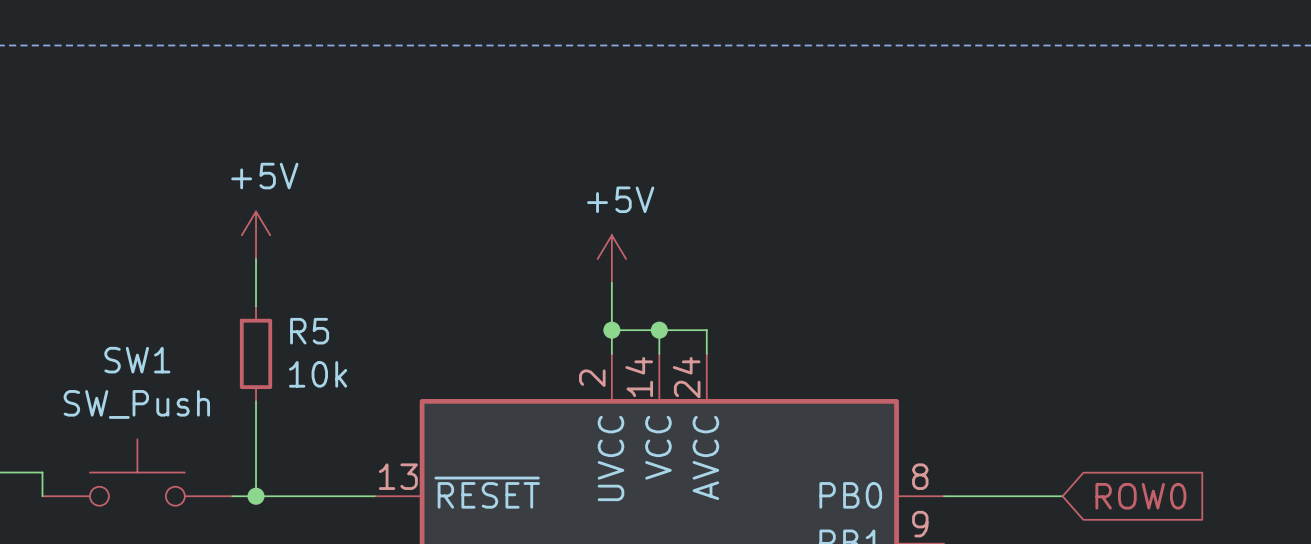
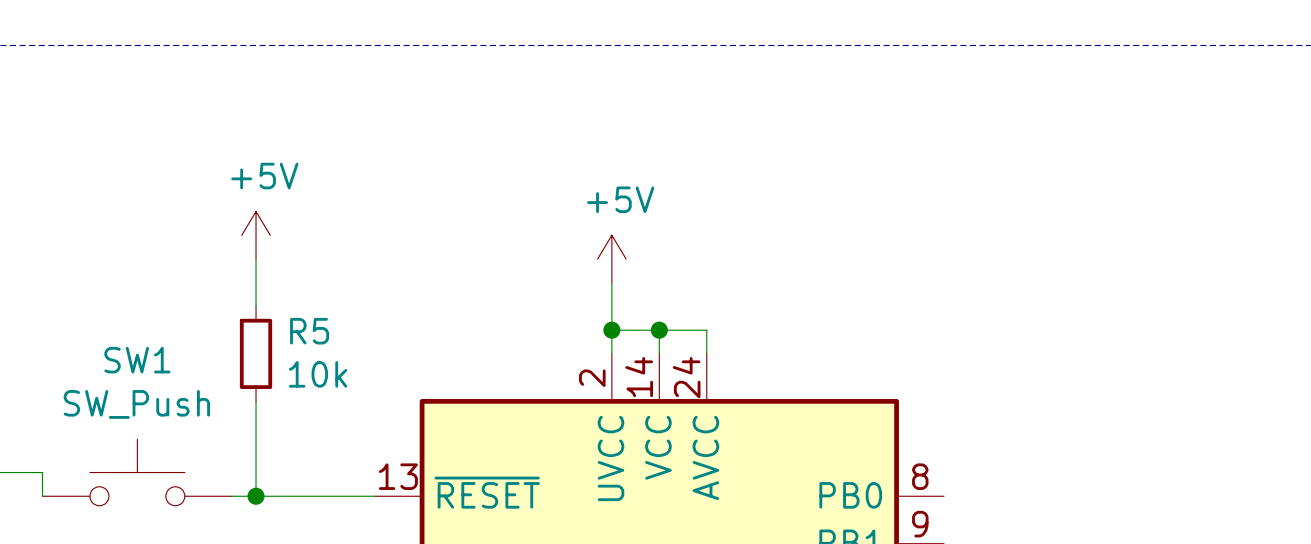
wire: (944, 496) (1062, 496) -> none
global label: ROW0 (1140, 496) -> none

